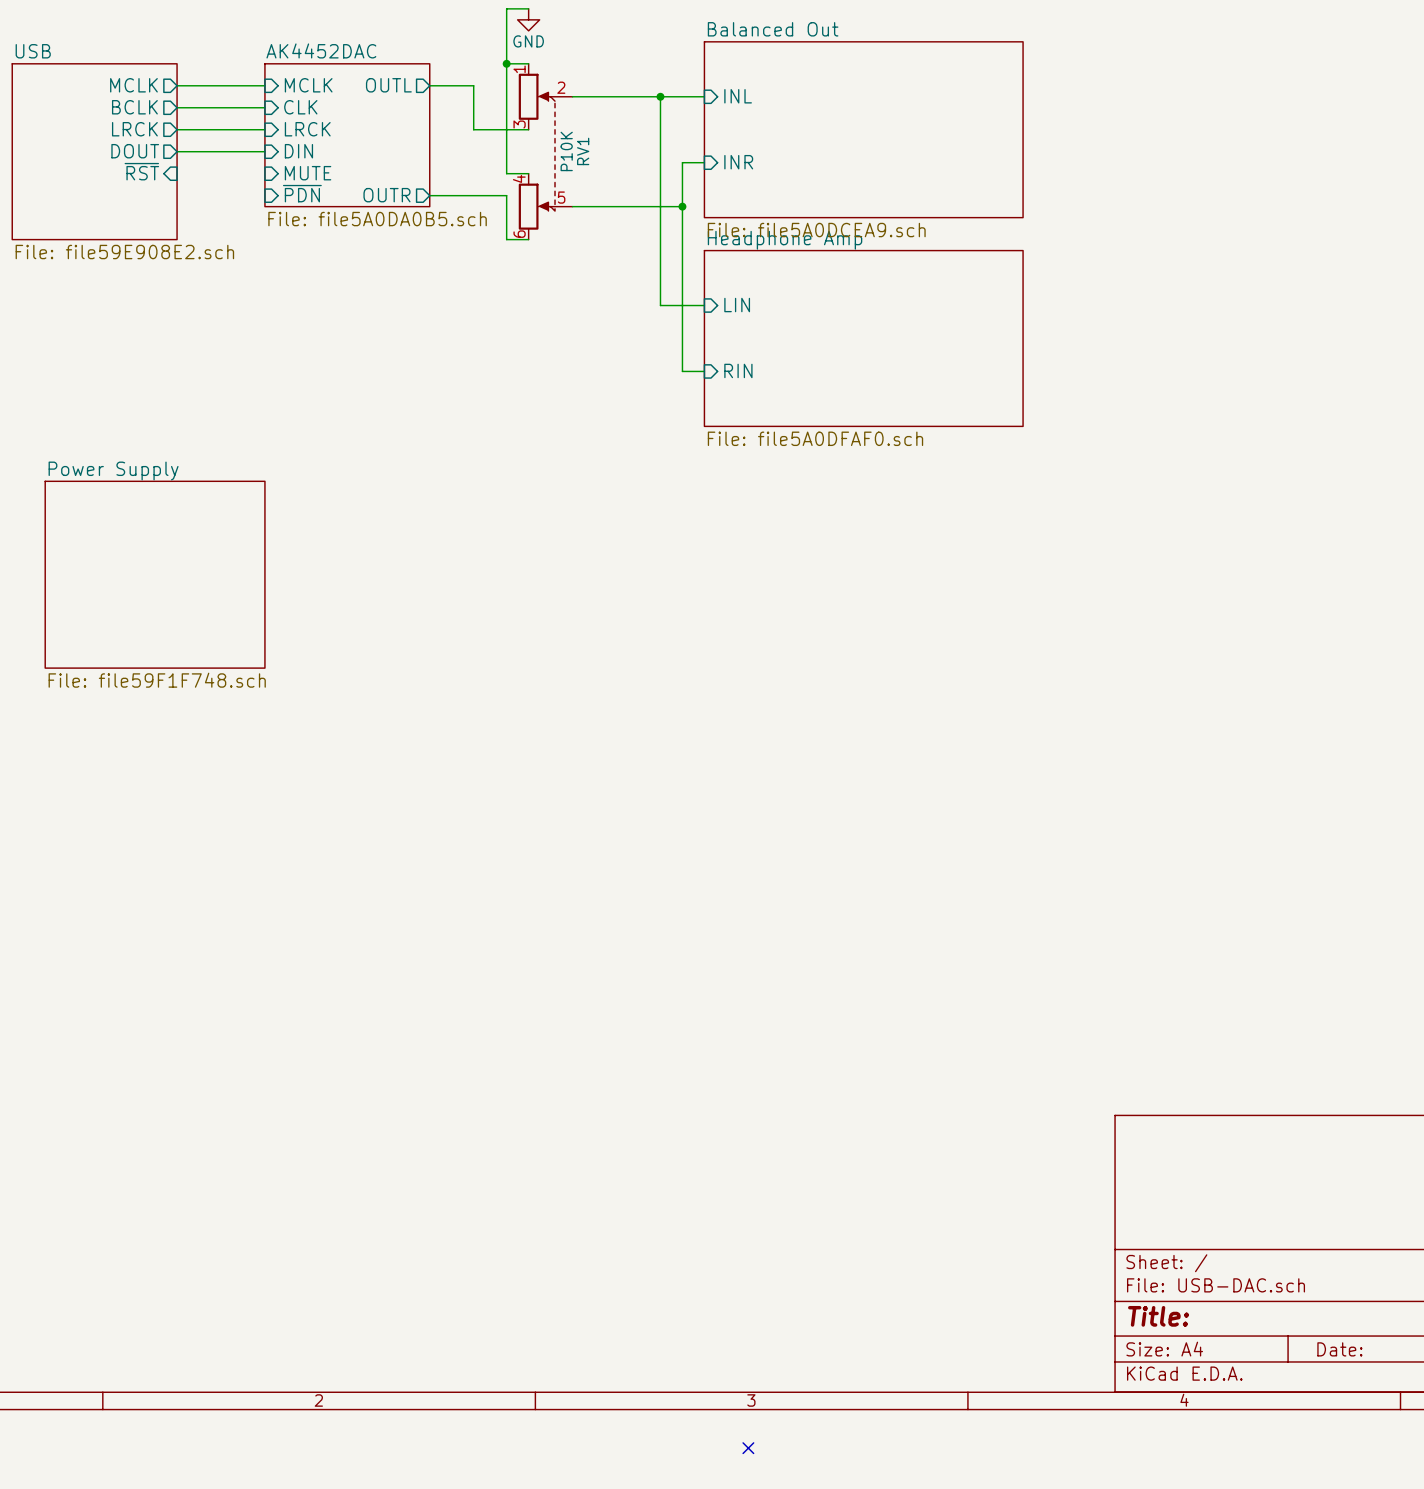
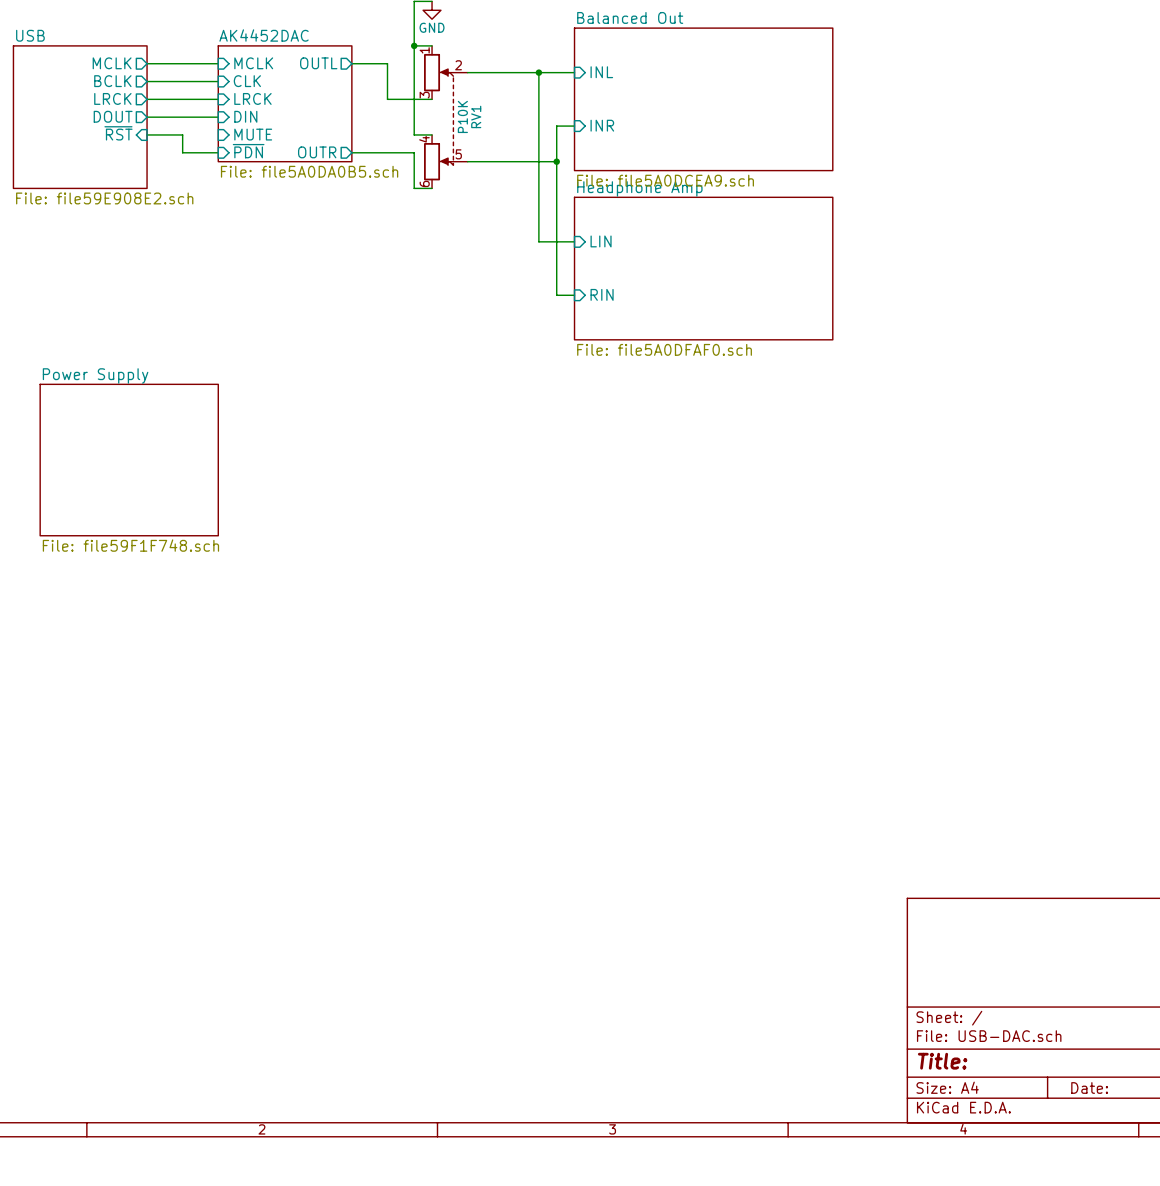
wire: none -> (147, 134) (182, 134) (182, 152) (218, 152)
no-connect mark: (748, 1448) -> none

